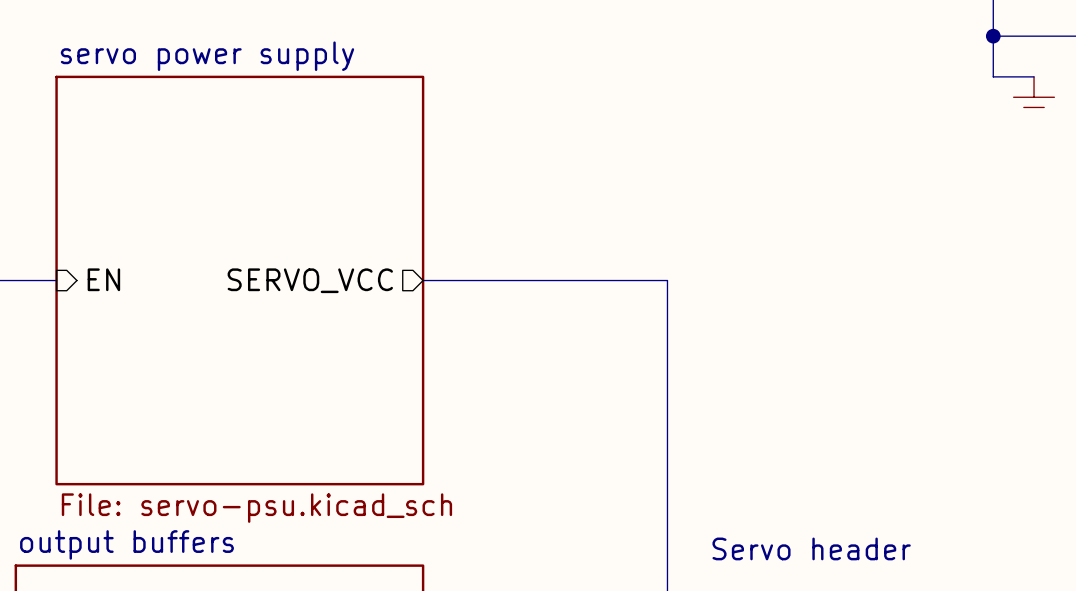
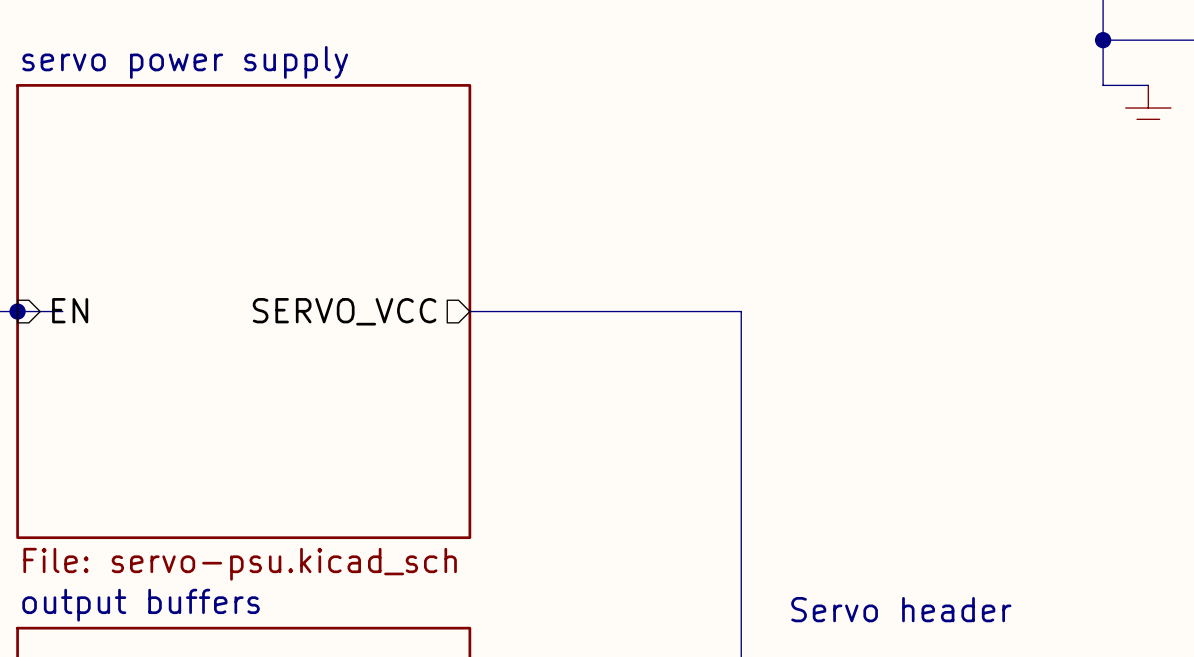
sheet pin position: EN (103, 279) -> EN (70, 310)
junction: none -> (17, 311)
sheet servo power supply: none -> File: servo-psu.kicad_sch (243, 311)
sheet servo power supply: File: servo-psu.kicad_sch (239, 280) -> none

